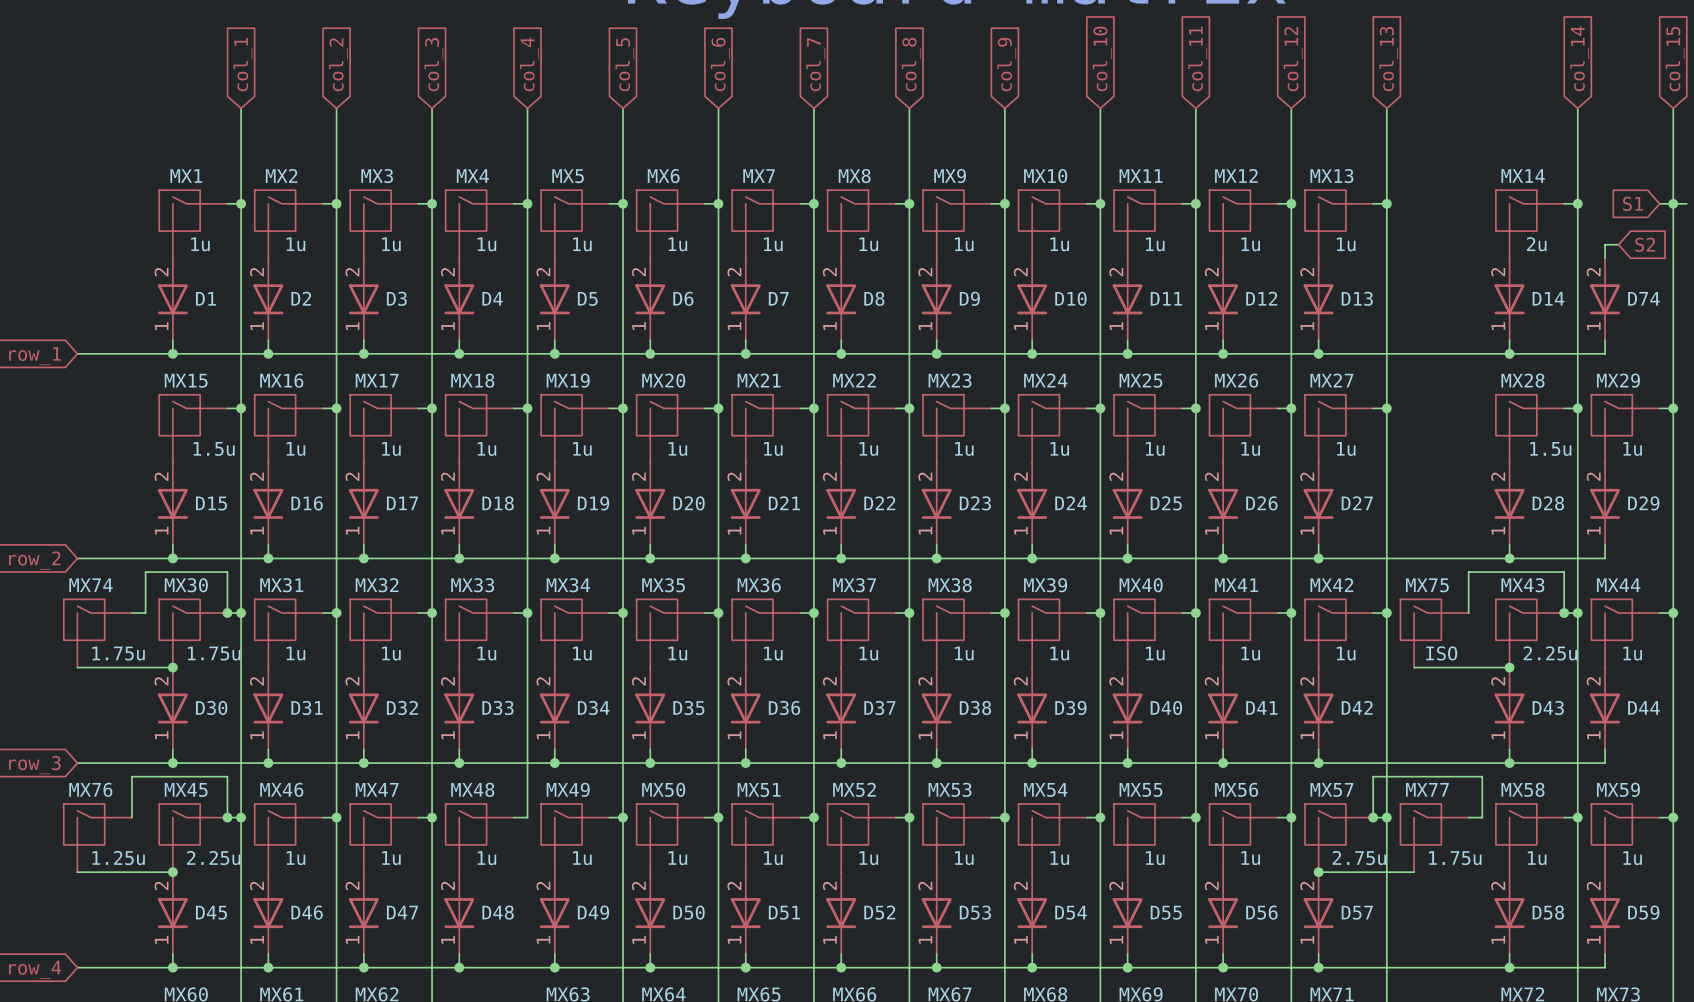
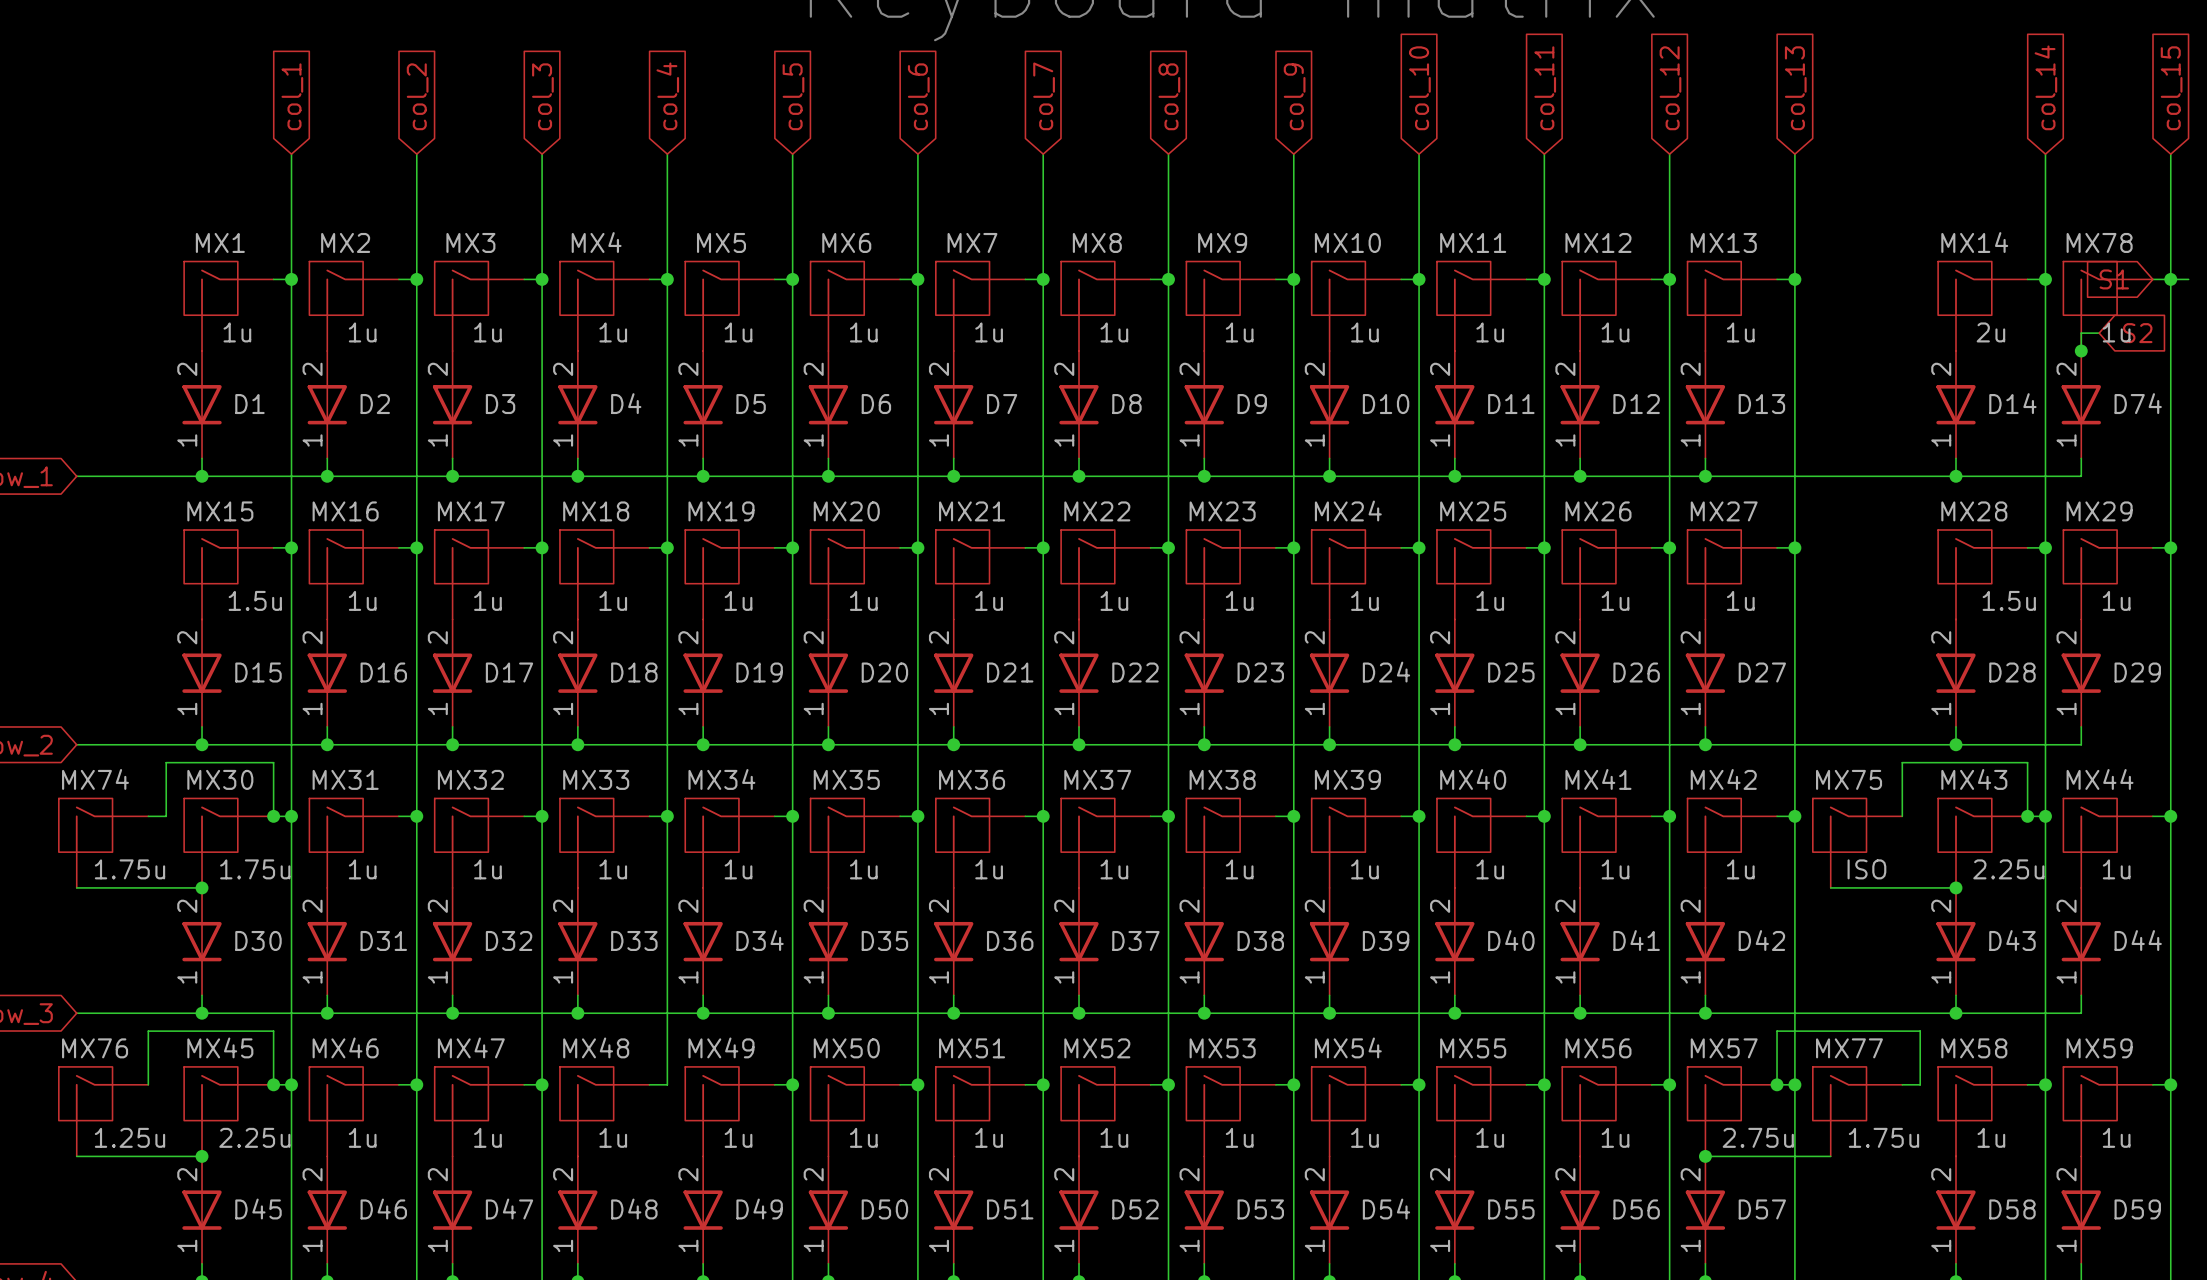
MX78: none -> (2108, 306)
junction: none -> (2081, 351)

